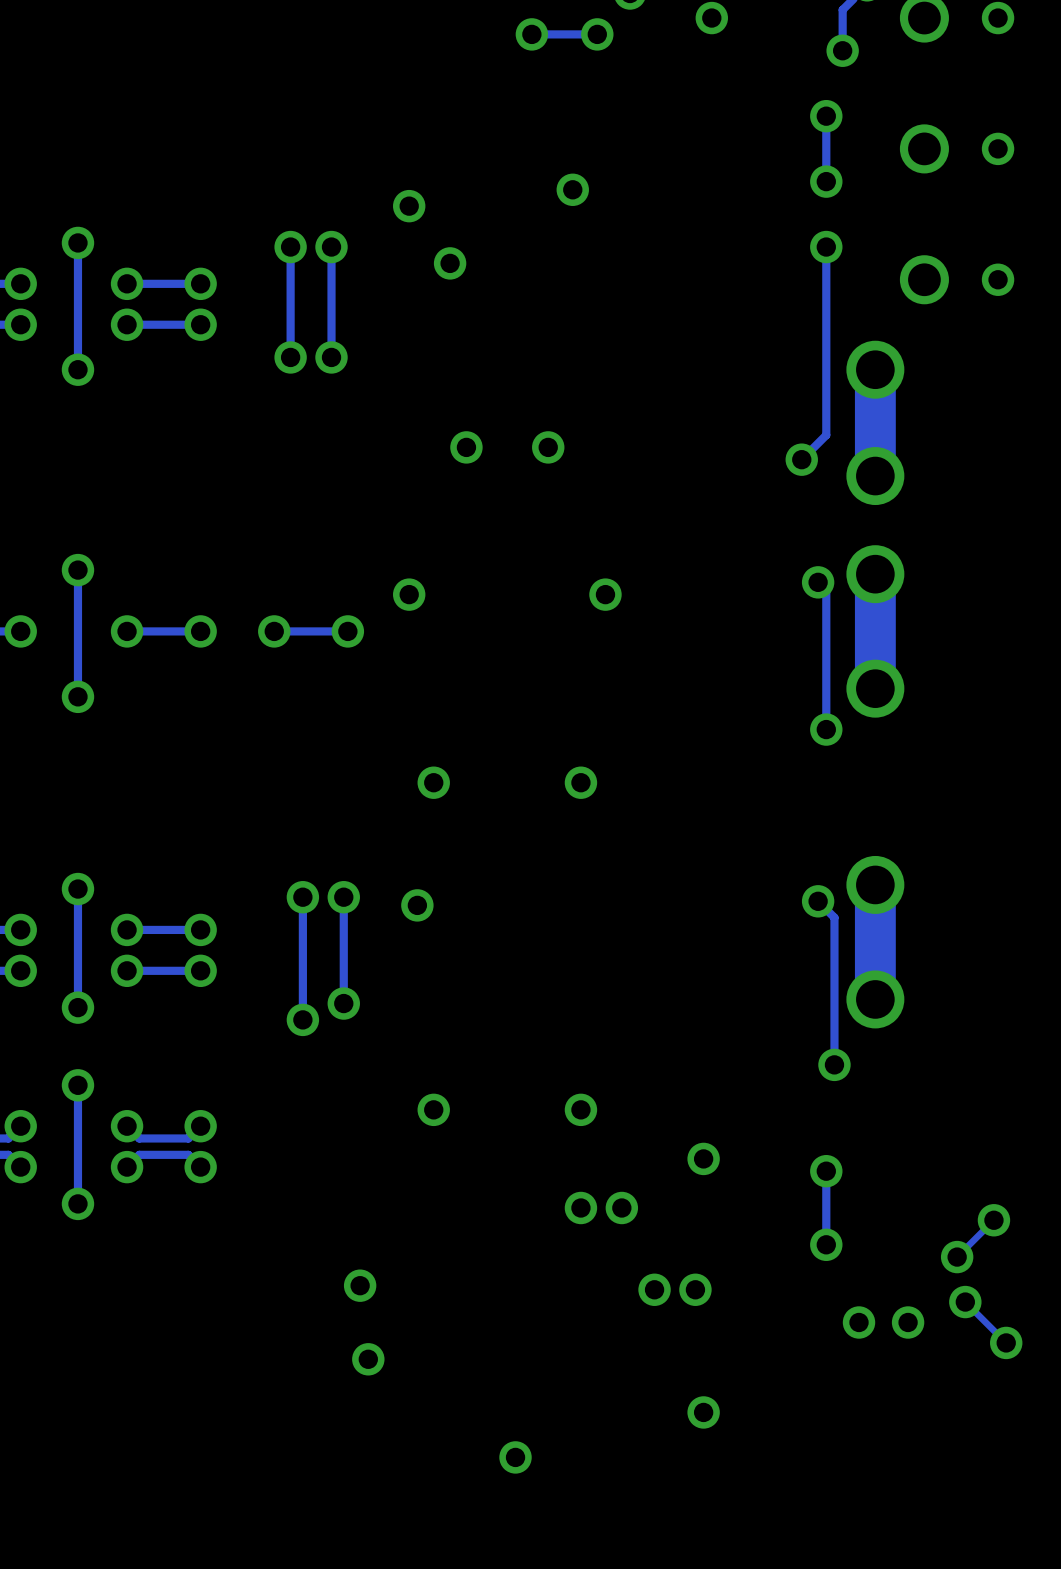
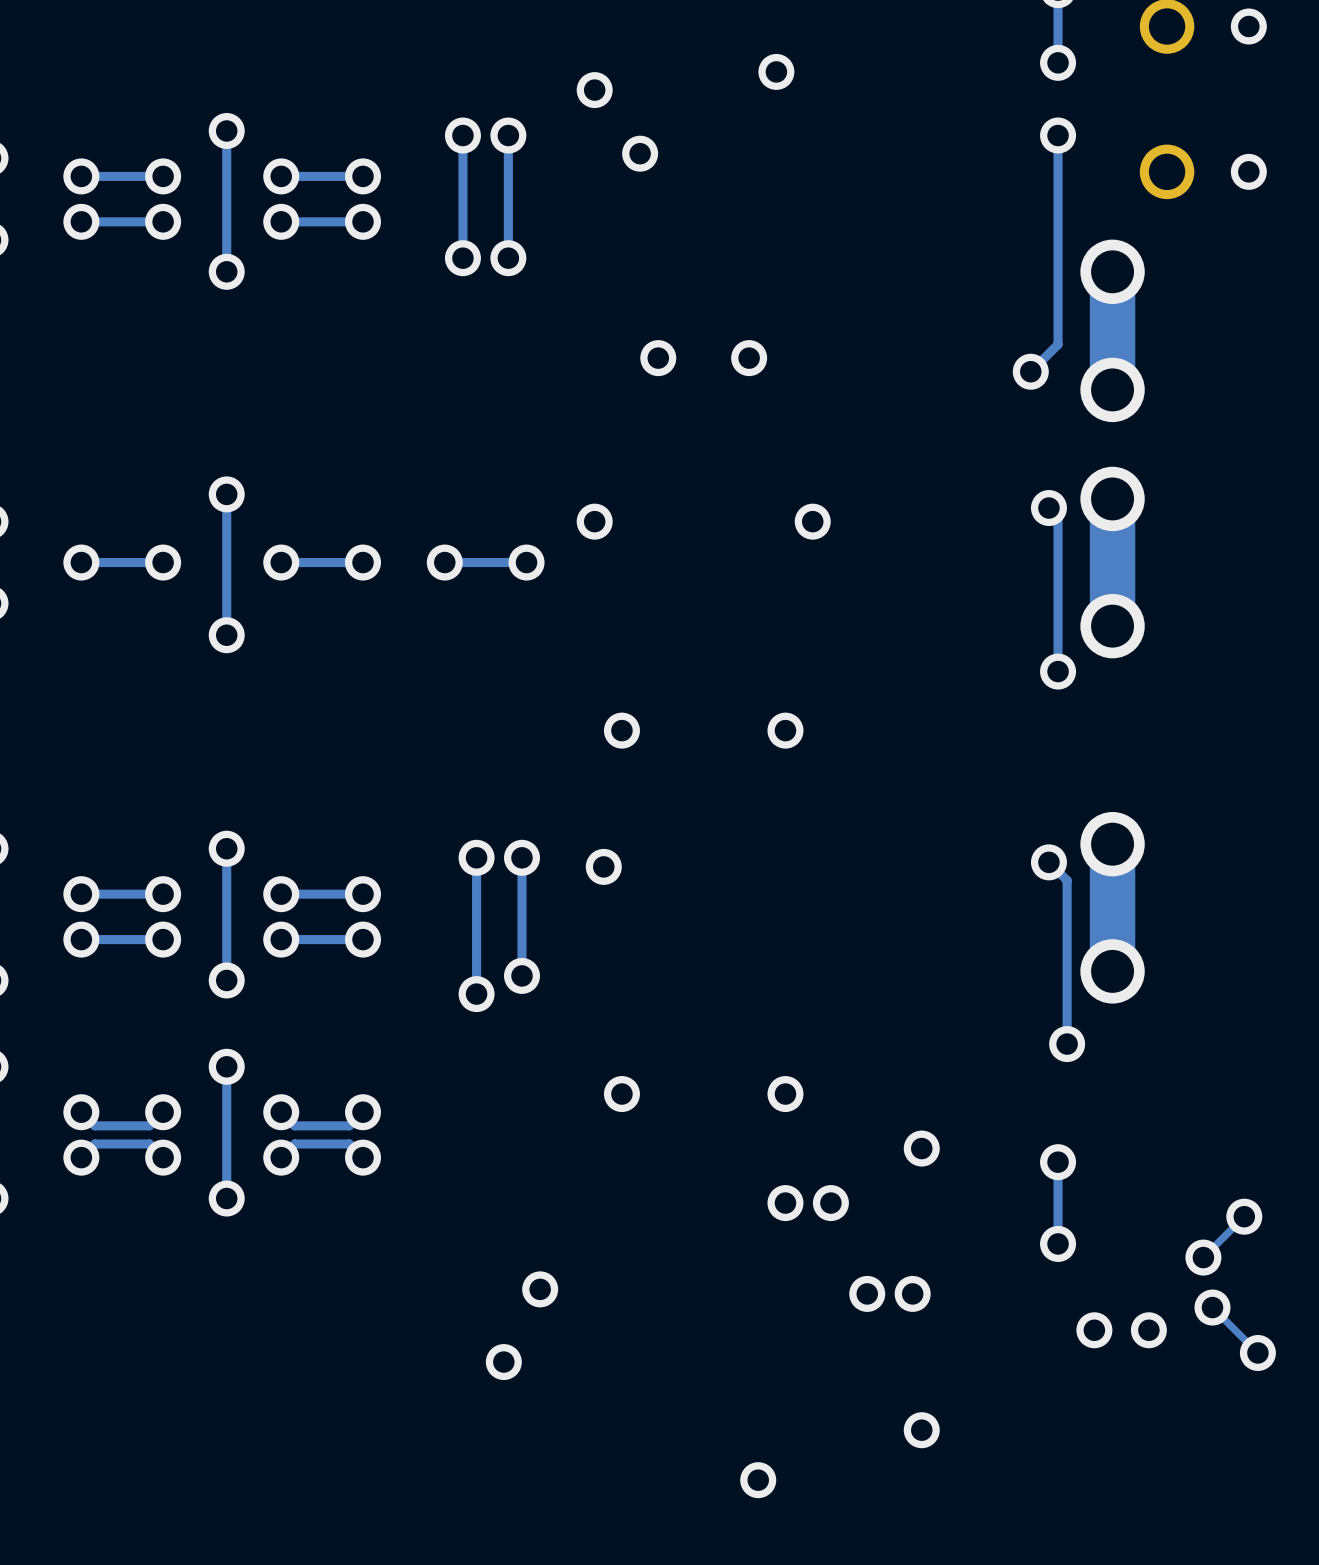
via position: (368, 1359) -> (503, 1362)
via position: (515, 1457) -> (758, 1480)

